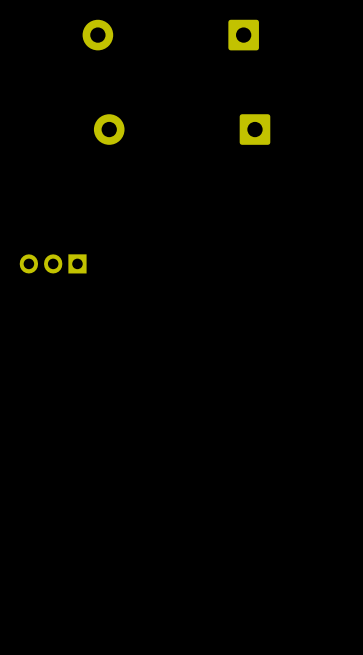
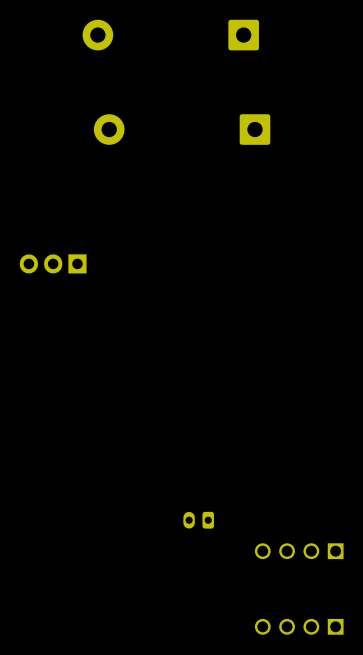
part: none -> (198, 520)
part: none -> (299, 551)
part: none -> (299, 626)

